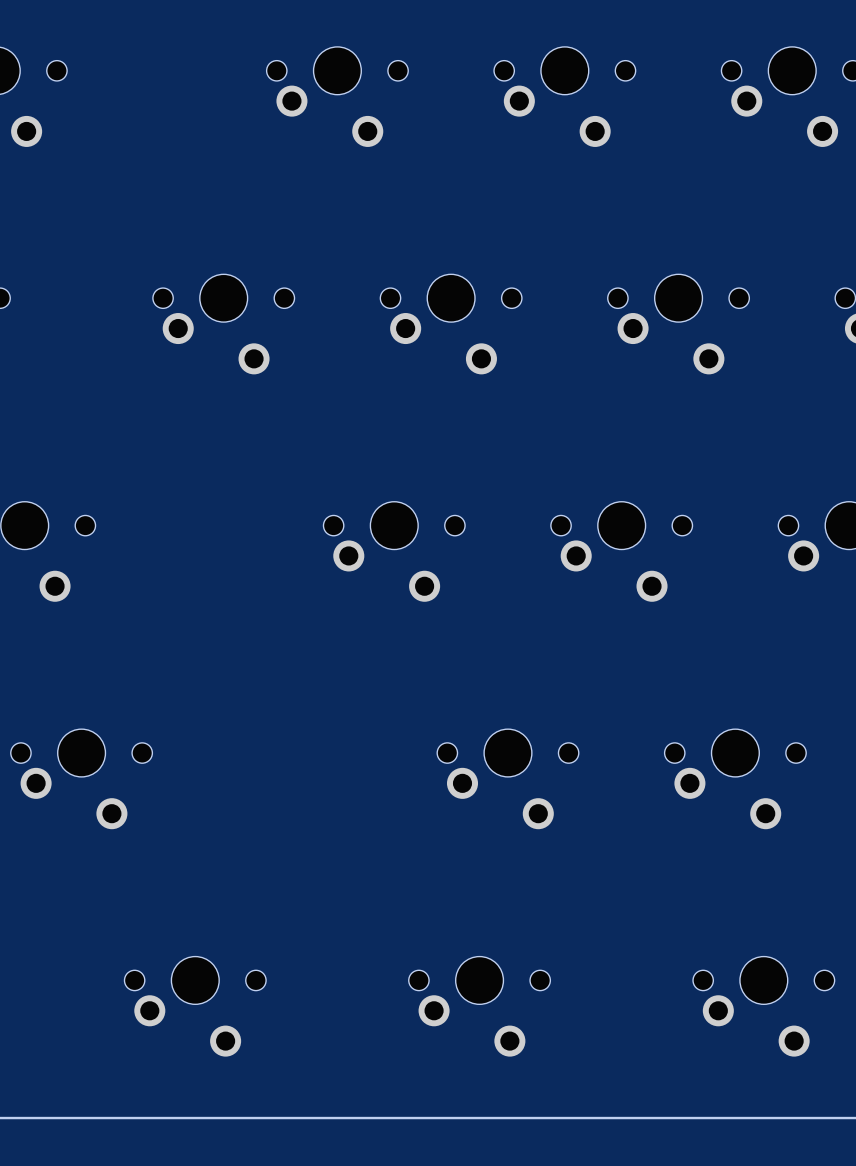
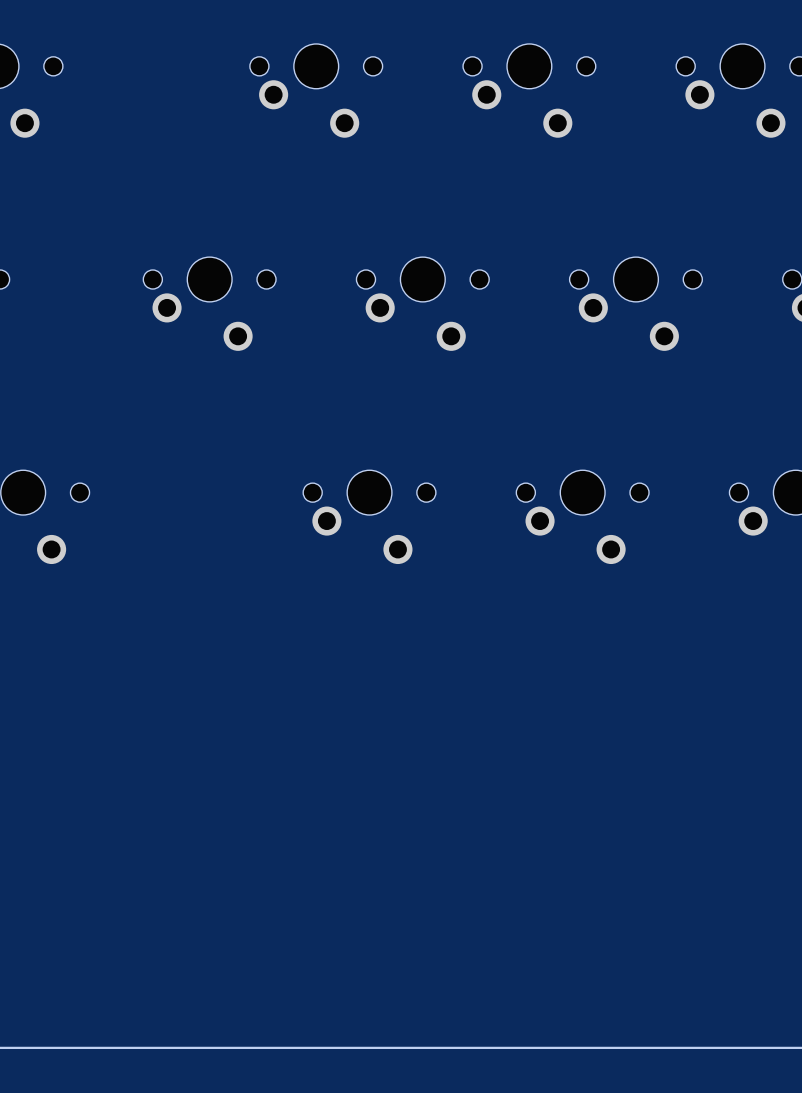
part: (81, 779) -> none
part: (507, 779) -> none
part: (735, 779) -> none
part: (195, 1006) -> none
part: (479, 1006) -> none
part: (763, 1006) -> none

